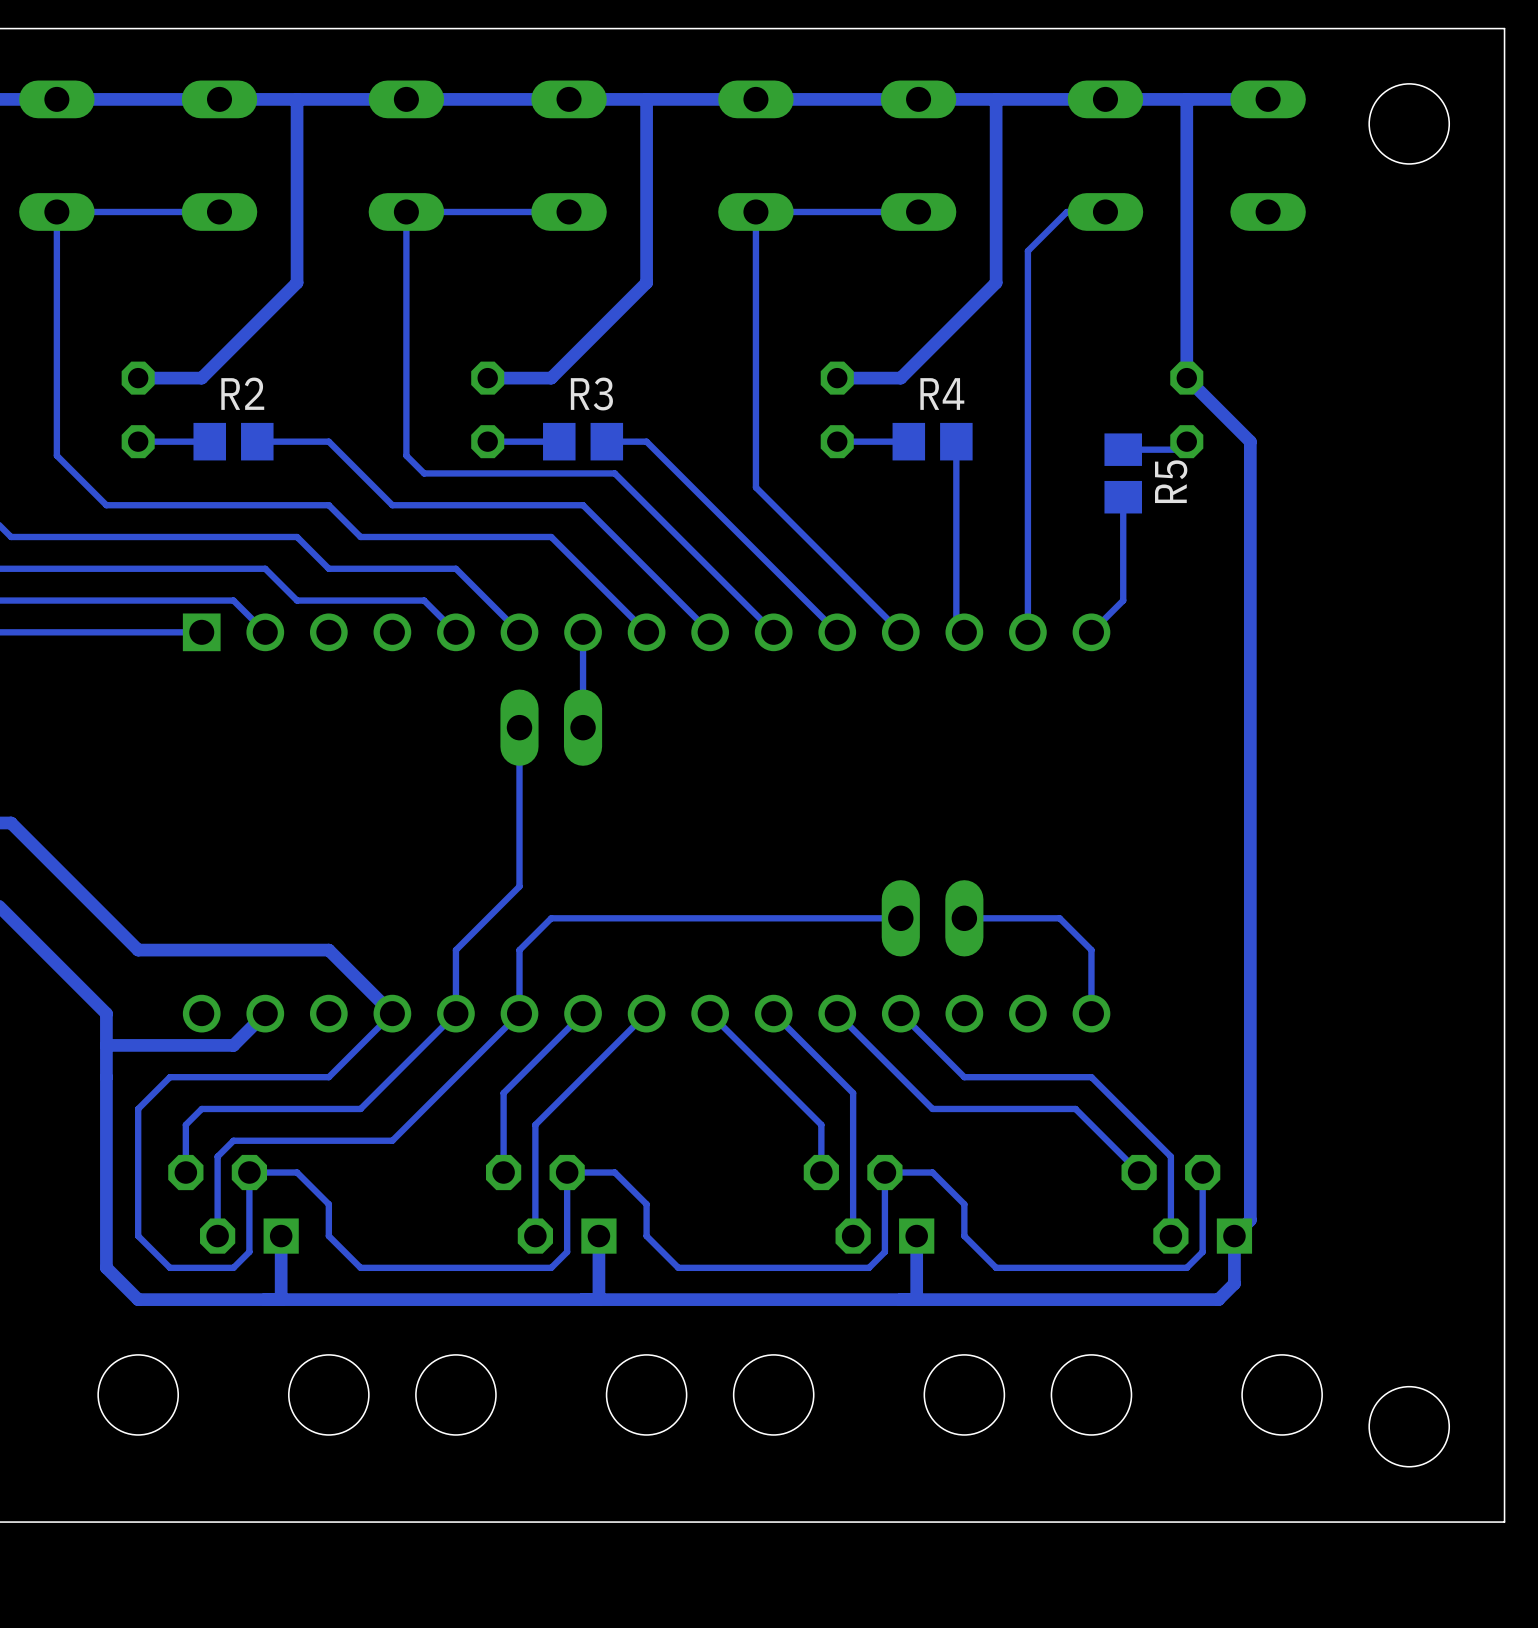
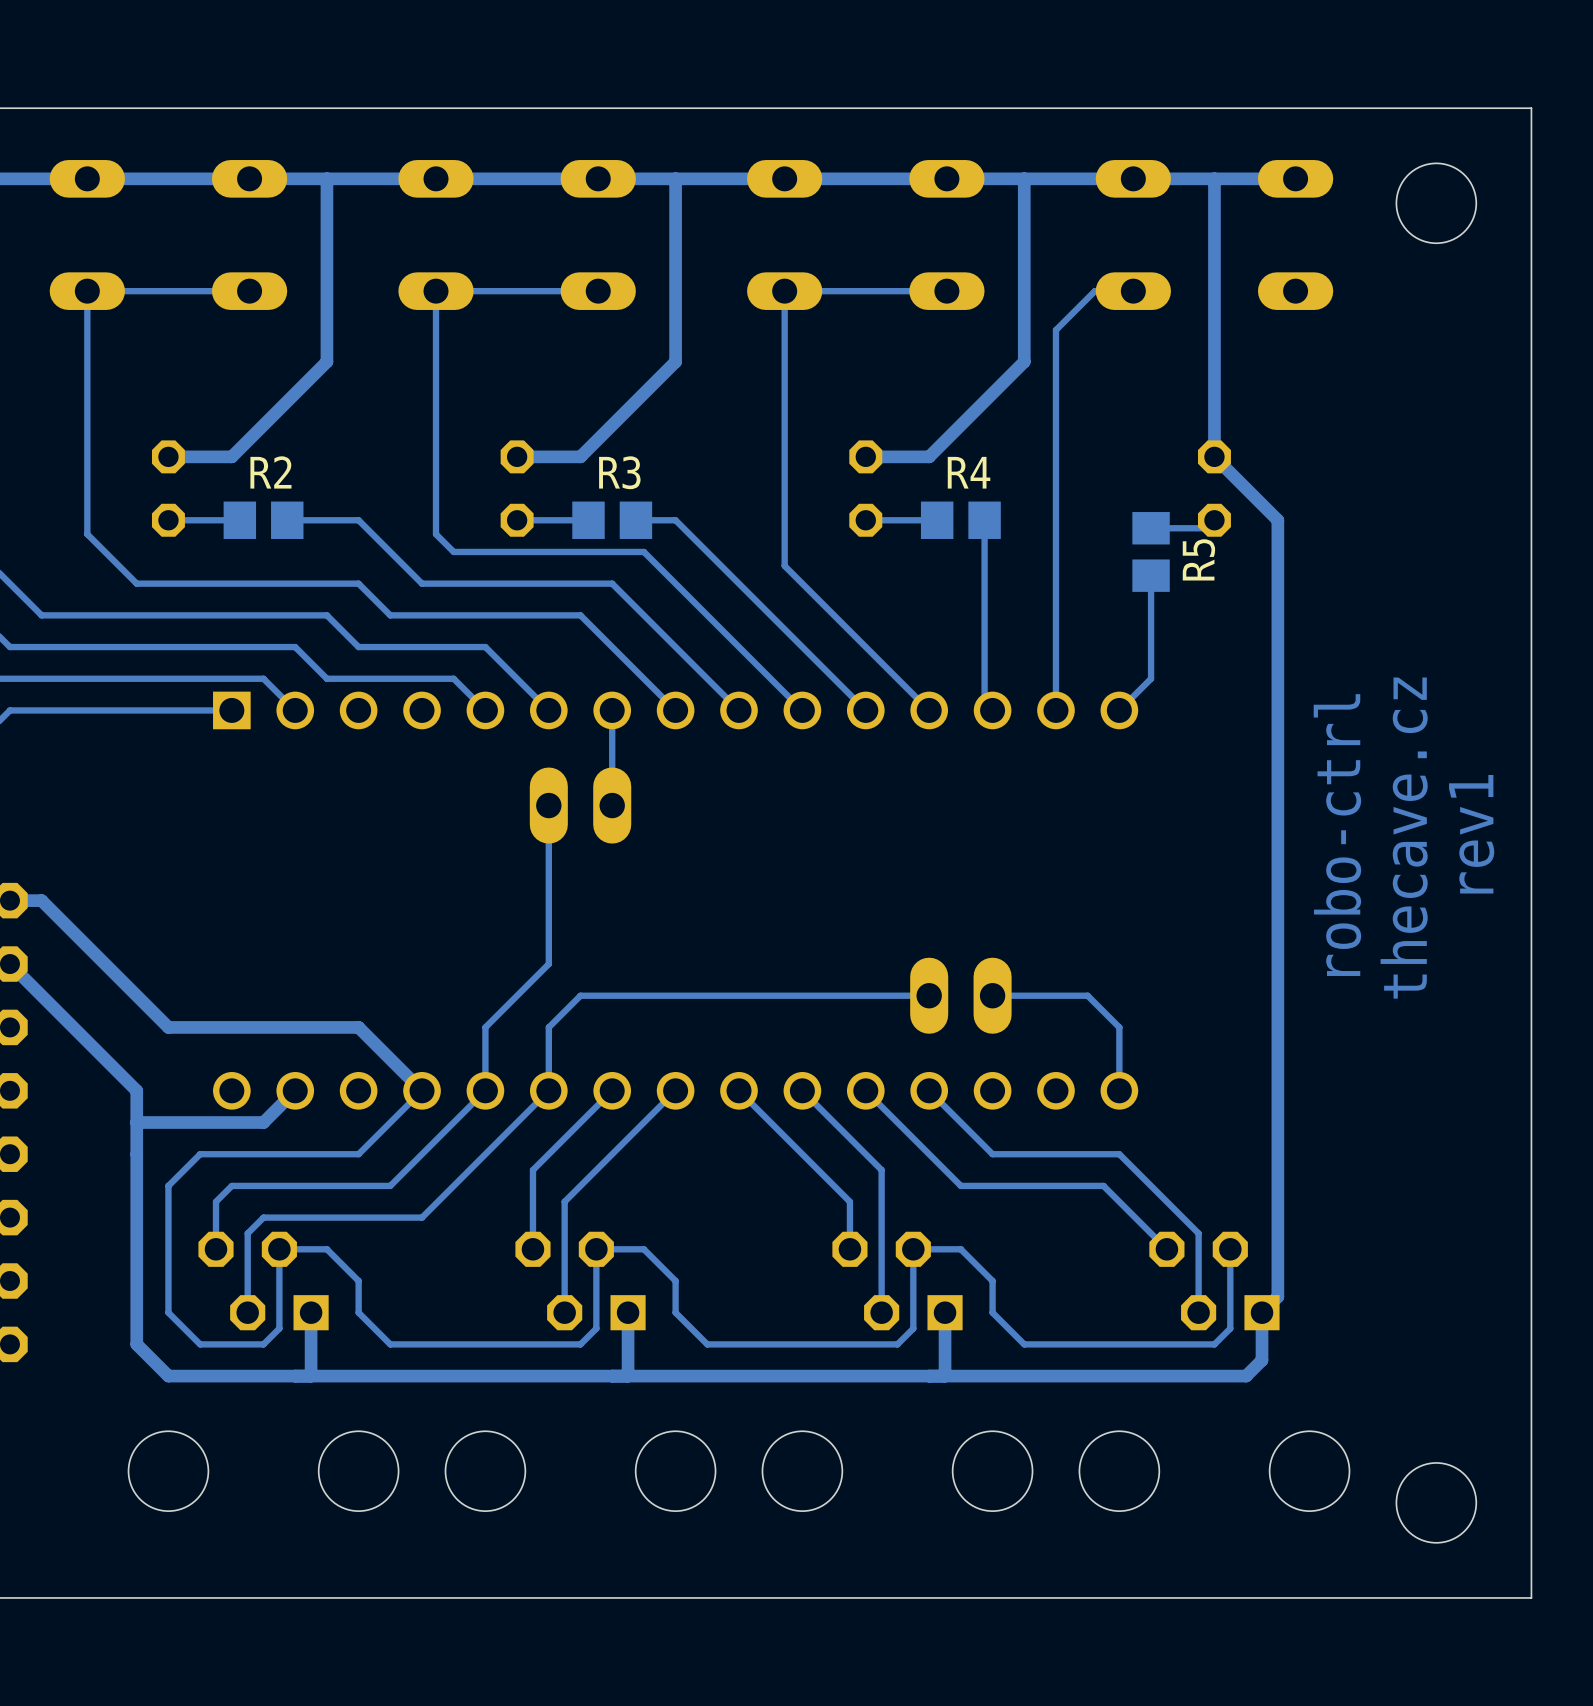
text: none -> rev1 (1471, 834)
text: none -> robo-ctrl (1337, 835)
text: none -> thecave.cz (1404, 838)

